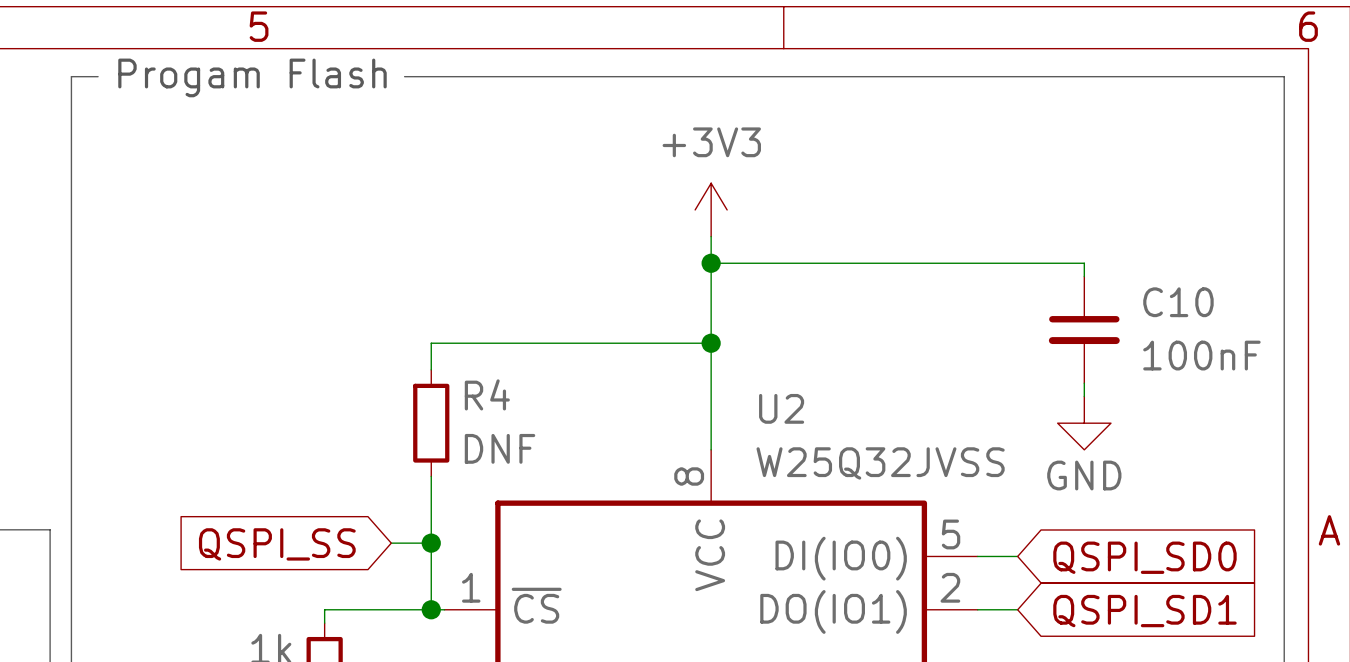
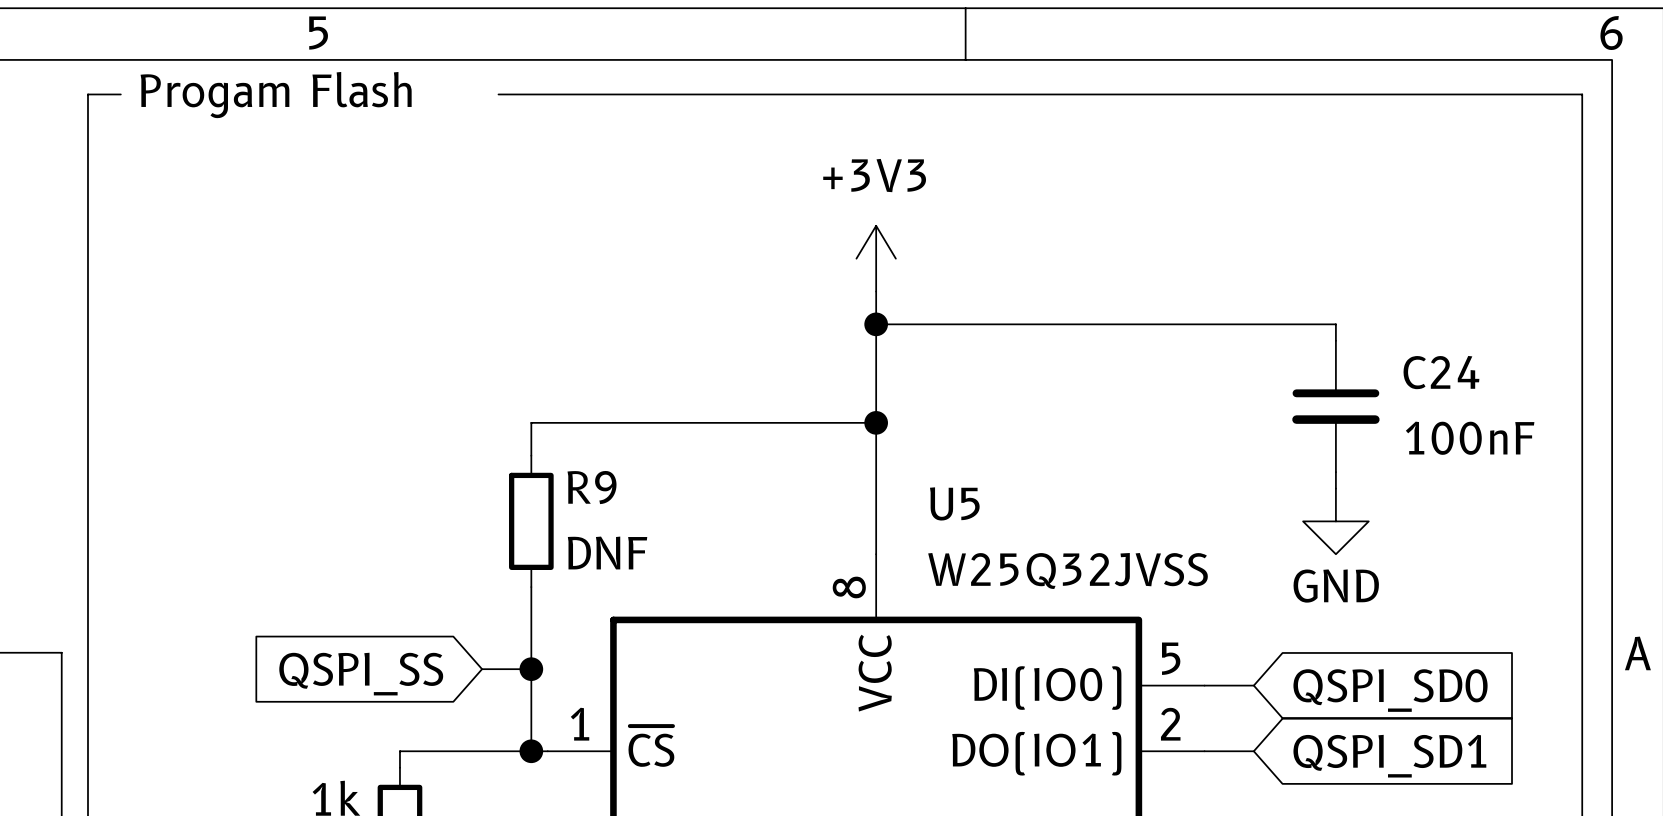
C10 name: C10 (1178, 302) -> C24 (1441, 372)
R4 name: R4 (487, 394) -> R9 (592, 487)
U2 name: U2 (781, 408) -> U5 (954, 503)

